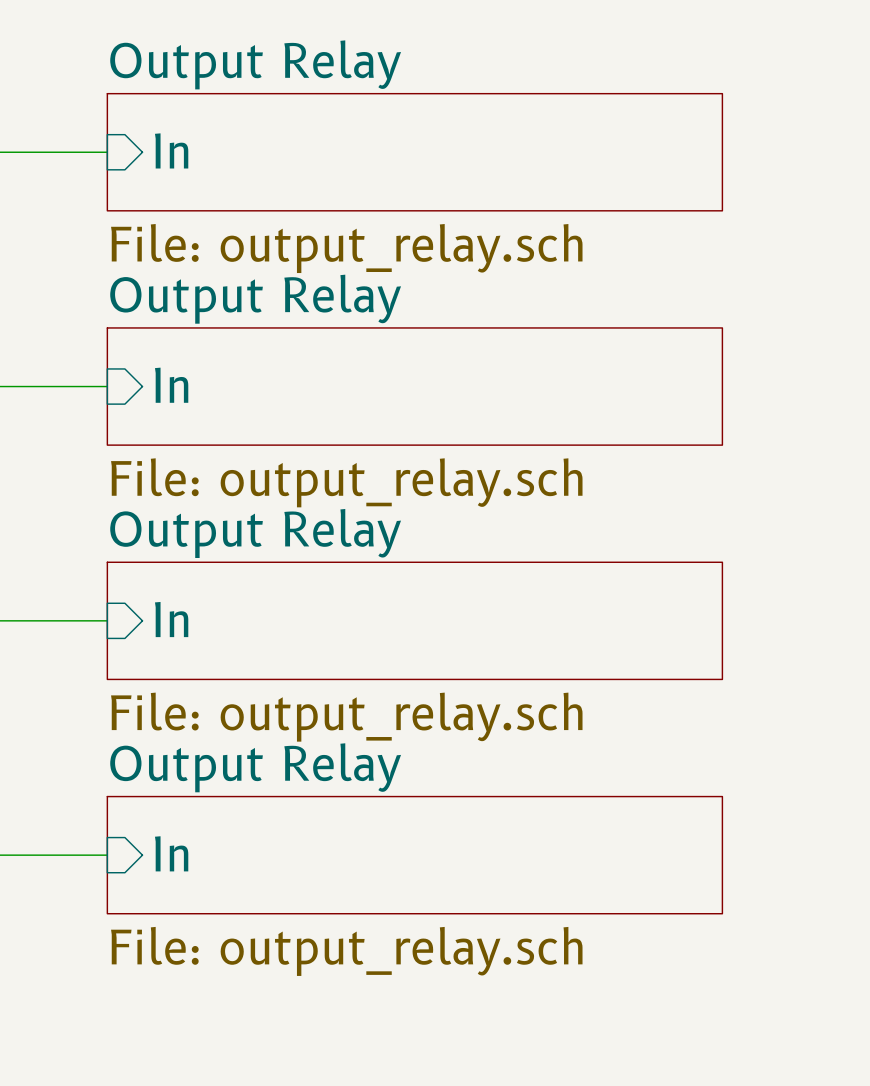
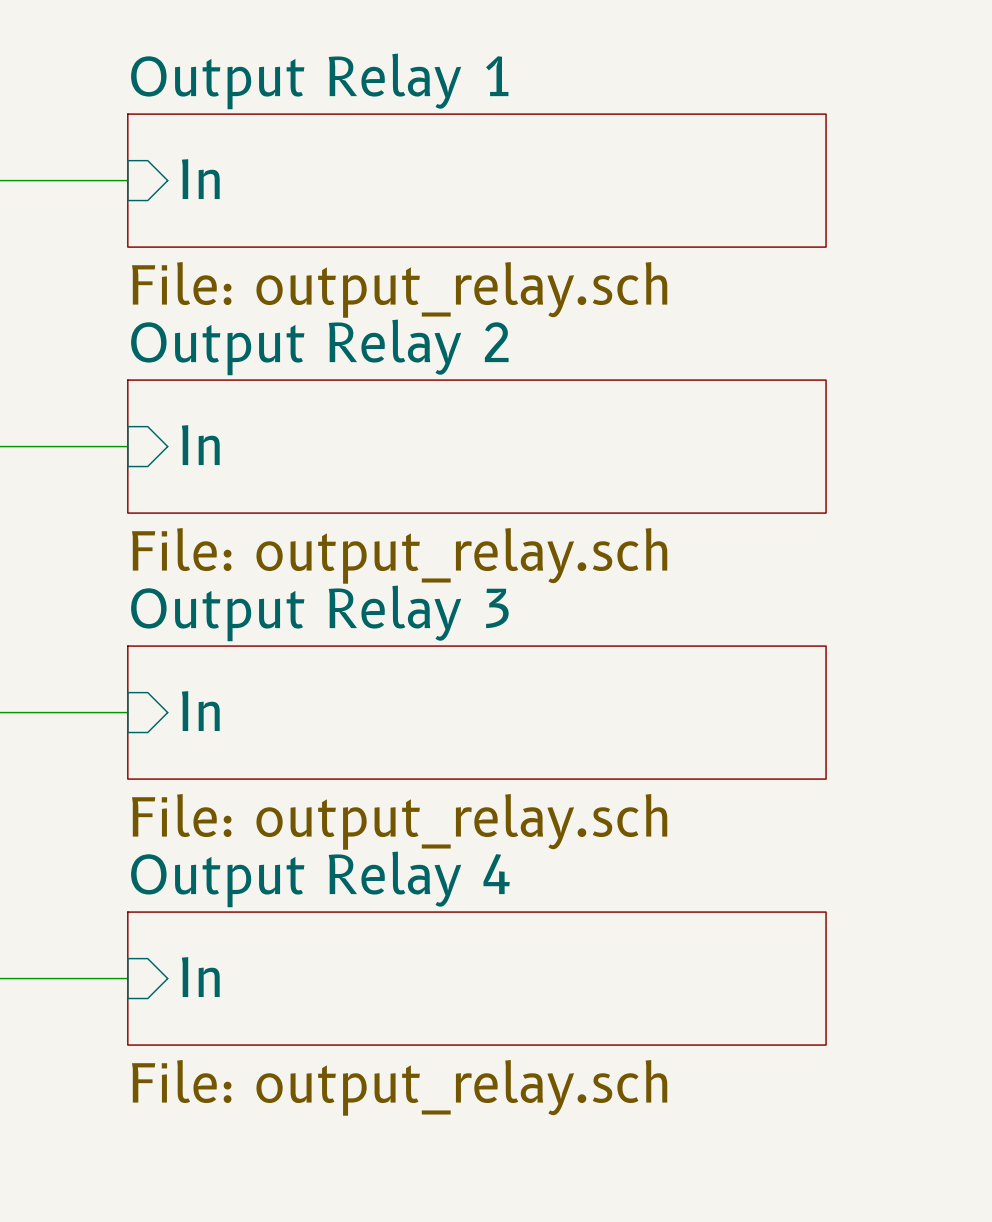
sheet Output Relay name: Output Relay (255, 64) -> Output Relay 1 (319, 81)
sheet Output Relay name: Output Relay (255, 299) -> Output Relay 2 (319, 347)
sheet Output Relay name: Output Relay (255, 533) -> Output Relay 3 (319, 613)
sheet Output Relay name: Output Relay (255, 767) -> Output Relay 4 (320, 879)

